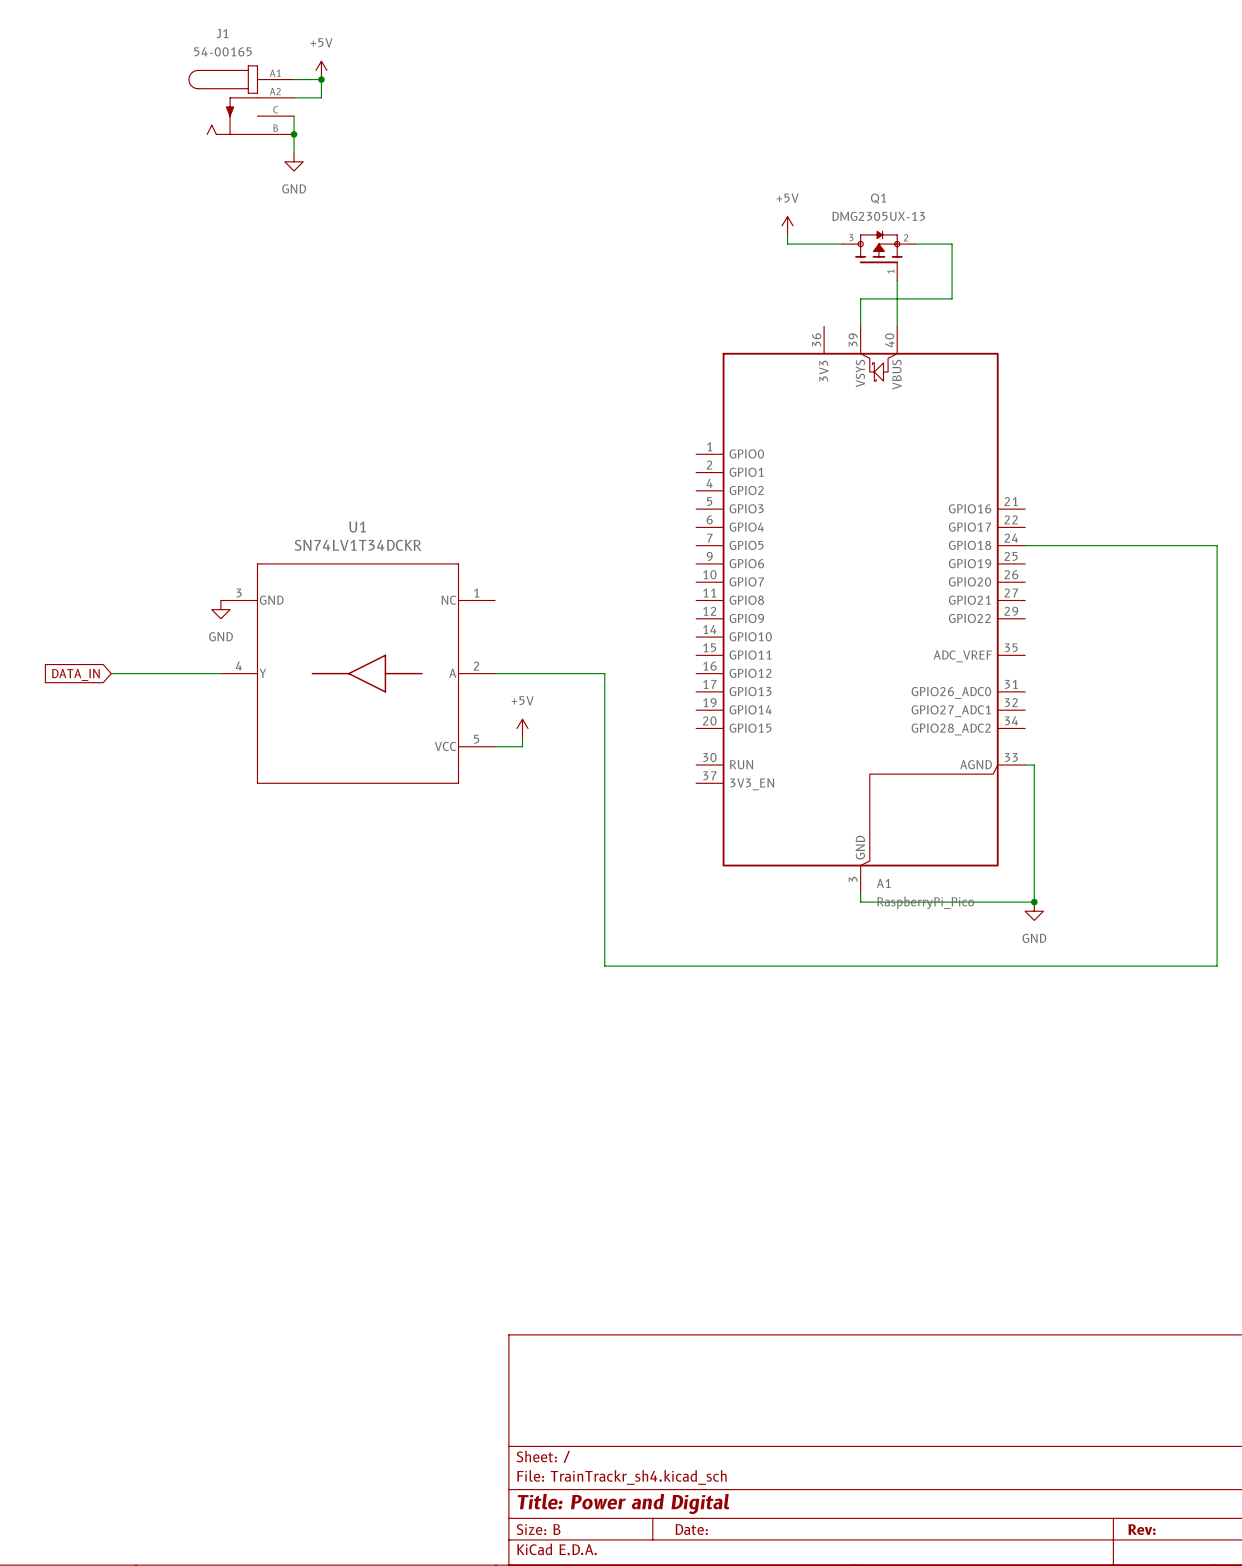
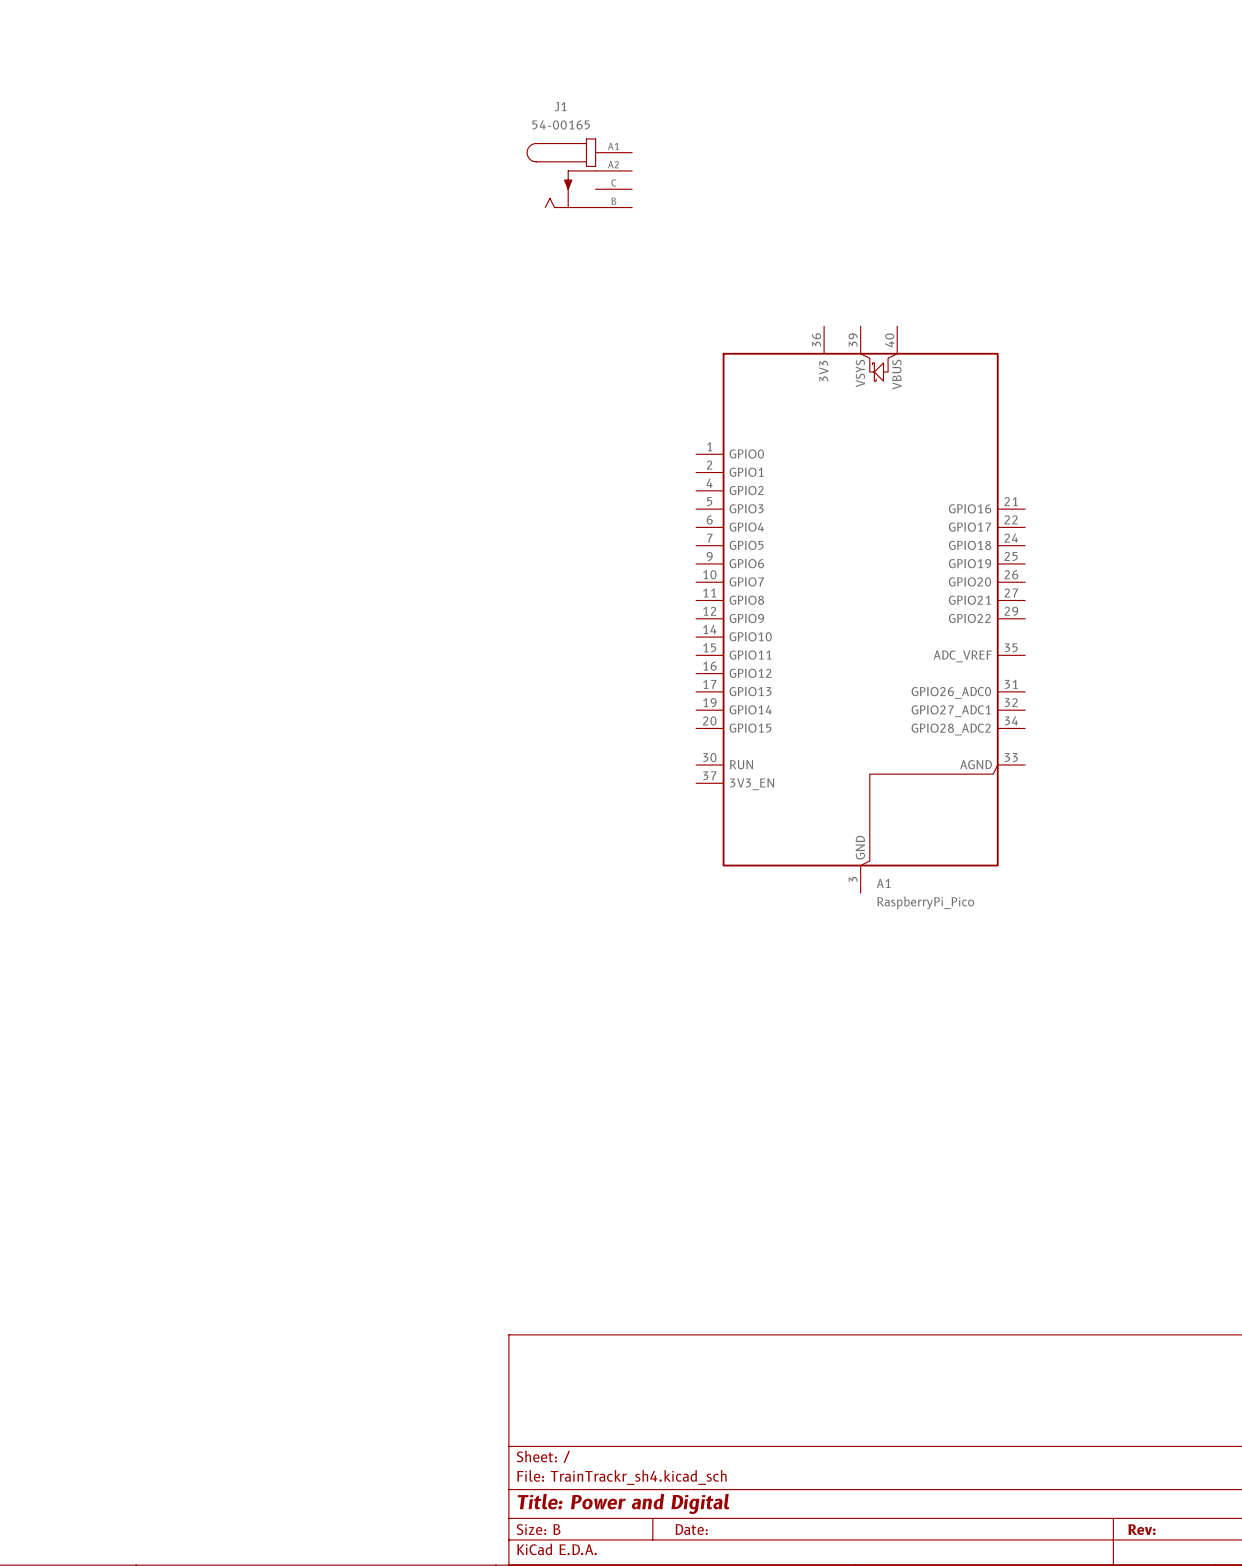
power symbol: +5V (321, 70) -> none
wire: (294, 79) (321, 79) (321, 97) (294, 97) -> none
junction: (321, 79) -> none
J1 position: (241, 100) -> (579, 173)
wire: (294, 116) (294, 152) -> none
junction: (294, 134) -> none
power symbol: GND (294, 161) -> none
power symbol: +5V (787, 225) -> none
wire: (787, 234) (787, 244) (842, 244) -> none
wire: (915, 244) (952, 244) (952, 298) (860, 298) (860, 326) -> none
Q1: DMG2305UX-13 (878, 255) -> none
wire: (897, 280) (897, 326) -> none
wire: (1025, 545) (1217, 545) (1217, 966) (604, 966) (604, 673) (495, 673) -> none
power symbol: GND (220, 609) -> none
wire: (111, 673) (220, 673) -> none
U1: SN74LV1T34DCKR (358, 673) -> none
global label: DATA_IN (75, 674) -> none
power symbol: +5V (522, 728) -> none
wire: (522, 737) (522, 746) (495, 746) -> none
wire: (1025, 765) (1034, 765) (1034, 902) (860, 902) (860, 892) -> none
junction: (1034, 902) -> none
power symbol: GND (1034, 911) -> none

